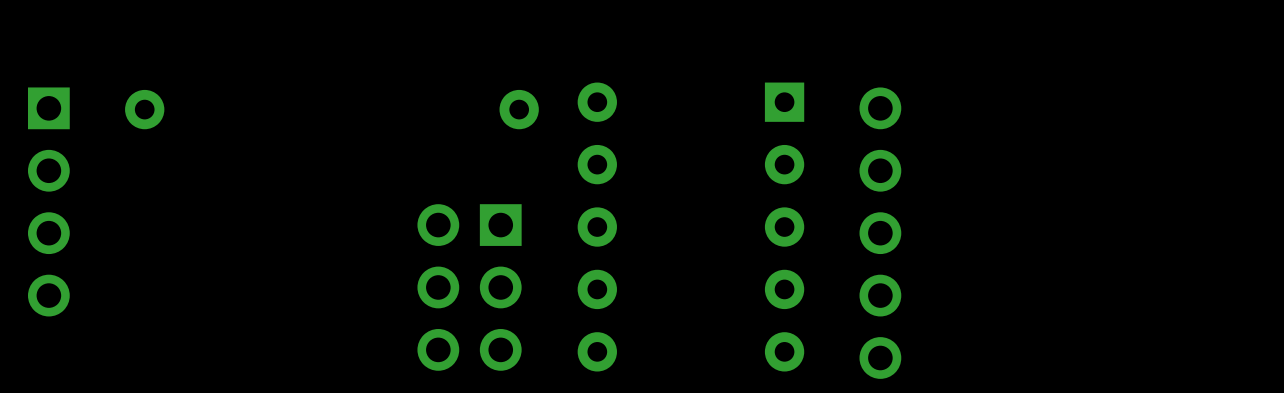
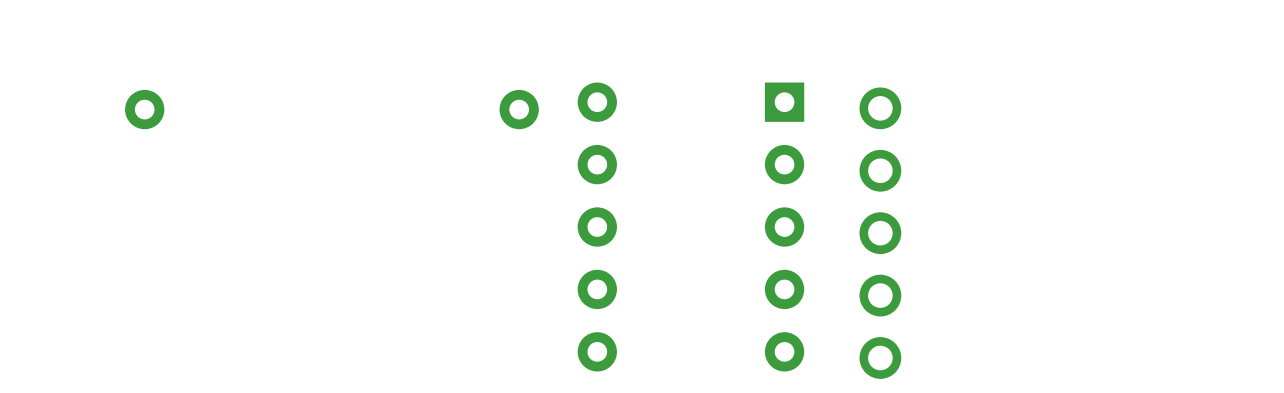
part: (48, 201) -> none
part: (469, 287) -> none

